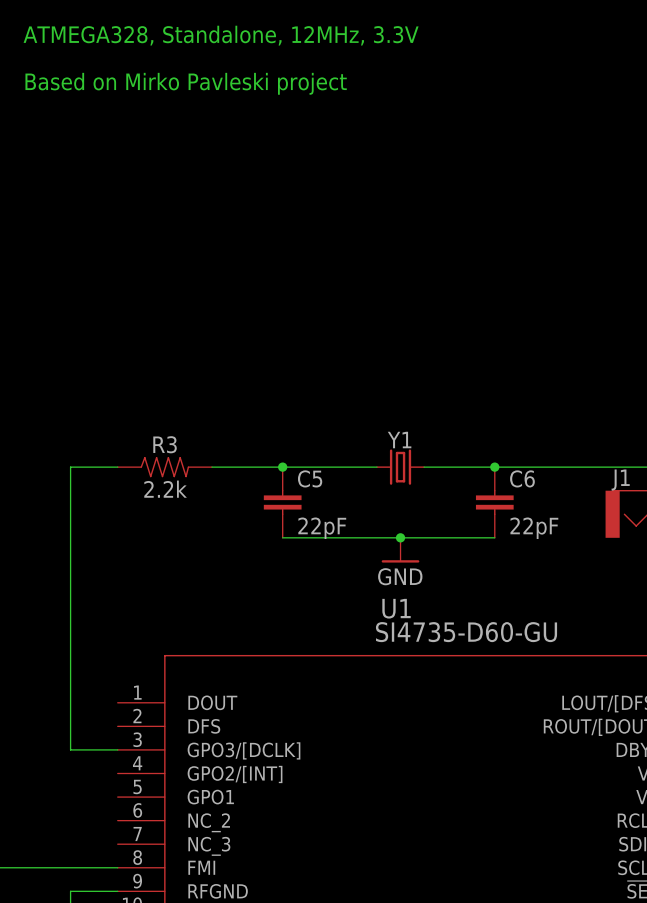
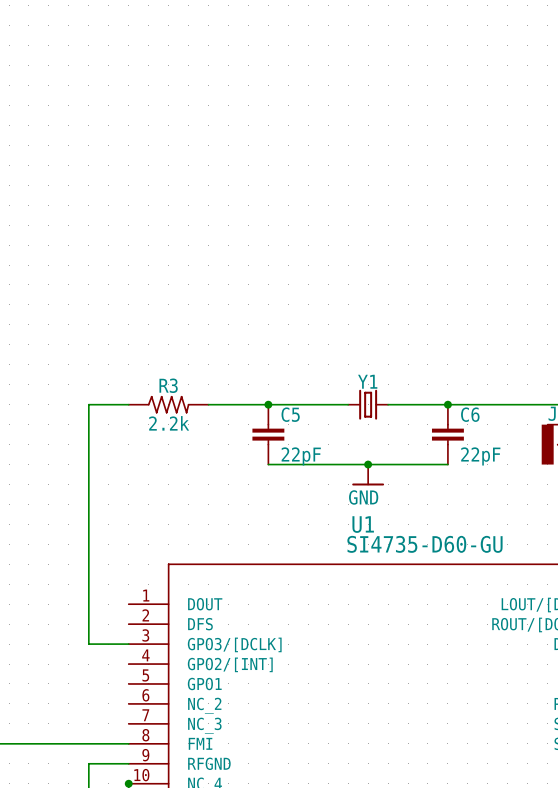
text: ATMEGA328, Standalone, 12MHz, 3.3V (221, 35) -> none
text: Based on Mirko Pavleski project (186, 83) -> none

